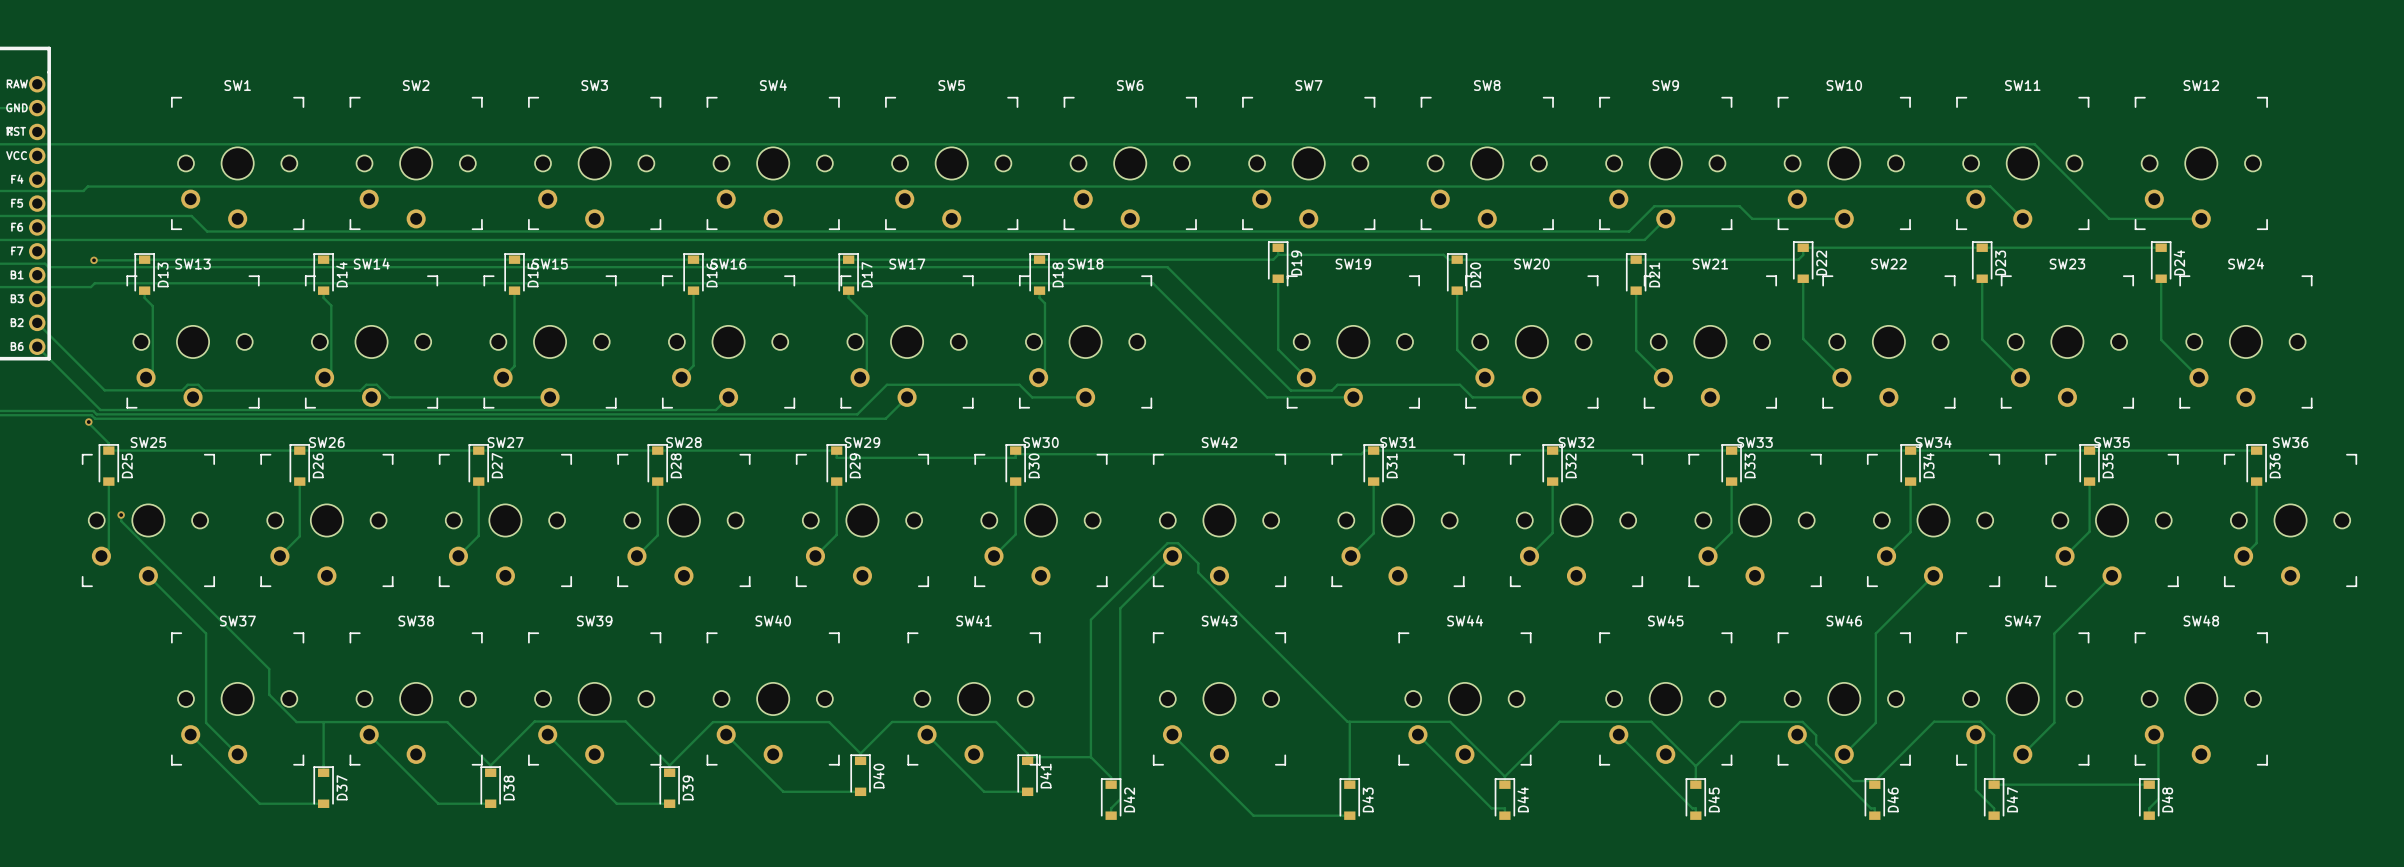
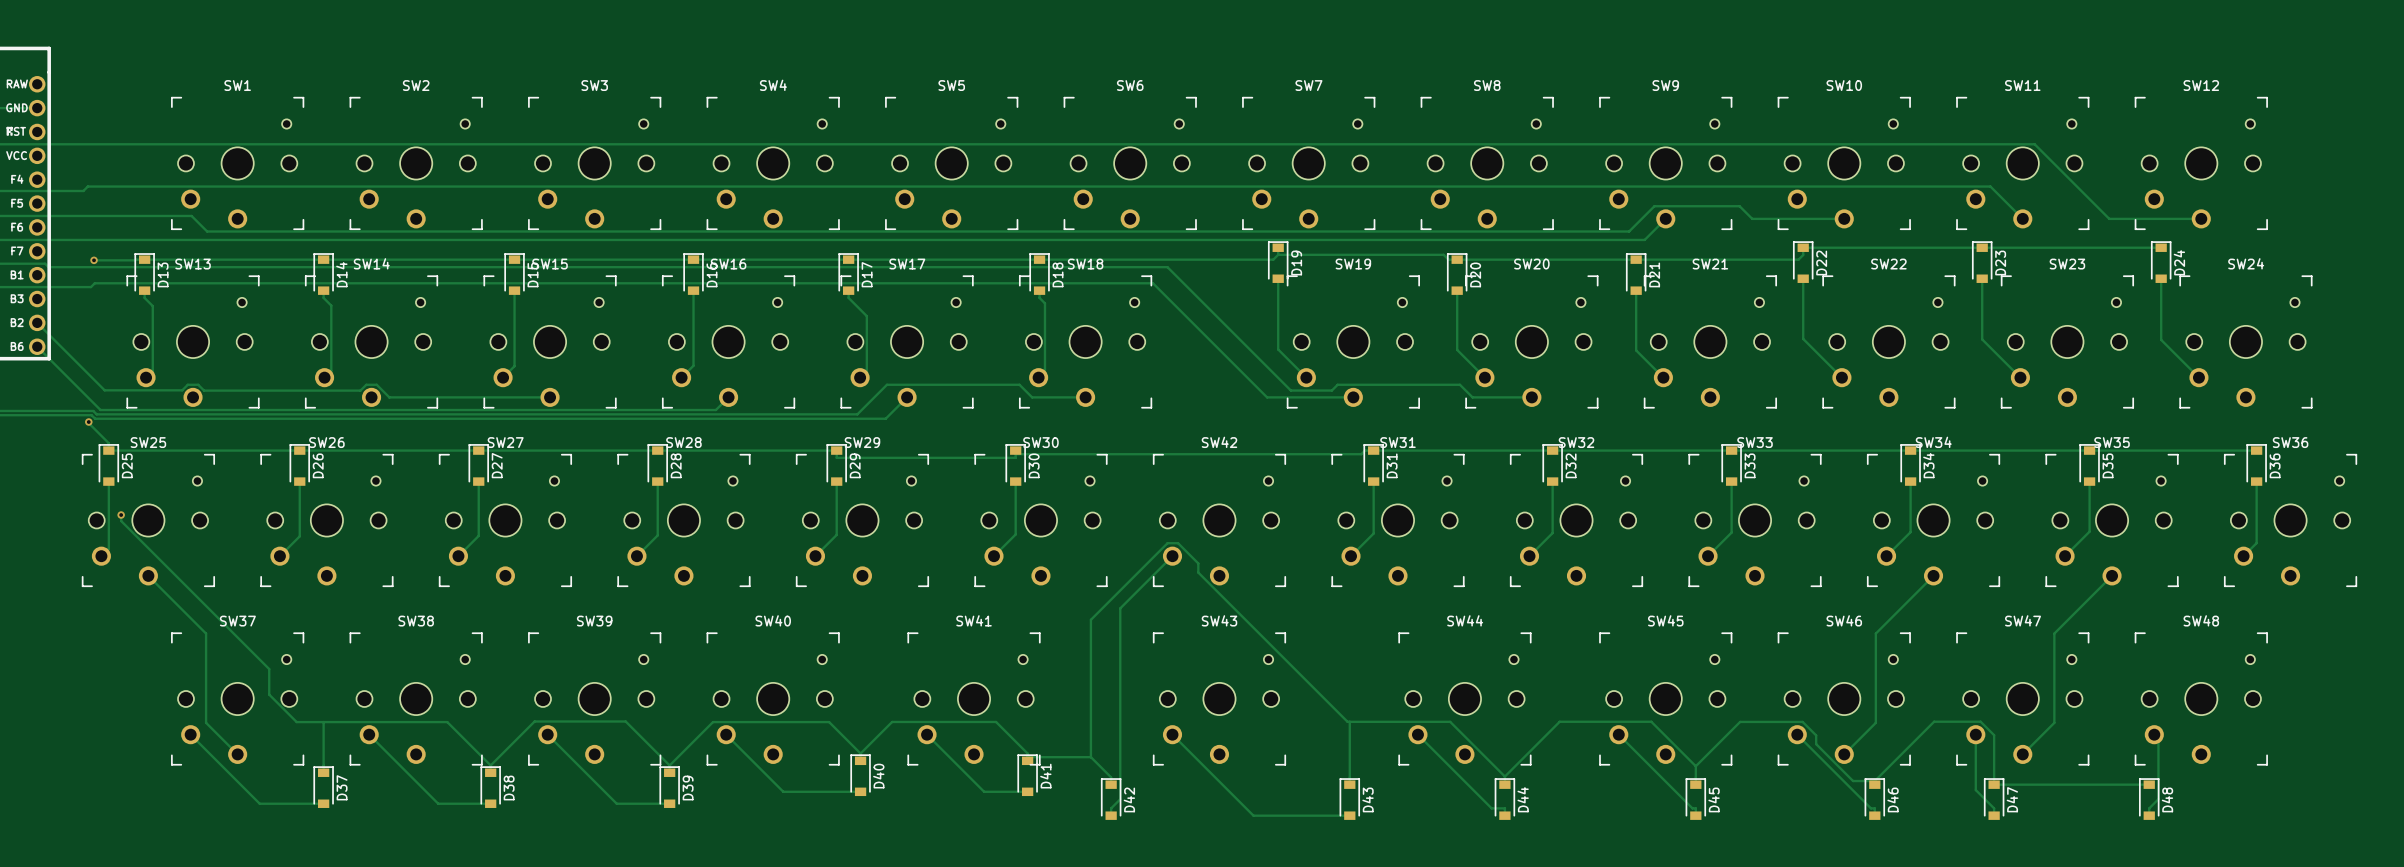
SW1 footprint: [171, 96, 305, 230] -> [171, 96, 305, 230]
SW2 footprint: [349, 96, 483, 230] -> [349, 96, 483, 230]
SW3 footprint: [528, 96, 662, 230] -> [528, 96, 662, 230]
SW4 footprint: [706, 96, 840, 230] -> [706, 96, 840, 230]
SW5 footprint: [885, 96, 1019, 230] -> [885, 96, 1019, 230]
SW6 footprint: [1063, 96, 1197, 230] -> [1063, 96, 1197, 230]
SW7 footprint: [1242, 96, 1376, 230] -> [1242, 96, 1376, 230]
SW8 footprint: [1420, 96, 1554, 230] -> [1420, 96, 1554, 230]
SW9 footprint: [1599, 96, 1733, 230] -> [1599, 96, 1733, 230]
SW10 footprint: [1777, 96, 1911, 230] -> [1777, 96, 1911, 230]
SW11 footprint: [1956, 96, 2090, 230] -> [1956, 96, 2090, 230]
SW12 footprint: [2134, 96, 2268, 230] -> [2134, 96, 2268, 230]
SW13 footprint: [126, 275, 260, 409] -> [126, 275, 260, 409]
SW14 footprint: [305, 275, 439, 409] -> [305, 275, 439, 409]
SW15 footprint: [483, 275, 617, 409] -> [483, 275, 617, 409]
SW16 footprint: [662, 275, 796, 409] -> [662, 275, 796, 409]
SW17 footprint: [840, 275, 974, 409] -> [840, 275, 974, 409]
SW18 footprint: [1019, 275, 1153, 409] -> [1019, 275, 1153, 409]
SW19 footprint: [1286, 275, 1420, 409] -> [1286, 275, 1420, 409]
SW20 footprint: [1465, 275, 1599, 409] -> [1465, 275, 1599, 409]
SW21 footprint: [1643, 275, 1777, 409] -> [1643, 275, 1777, 409]
SW22 footprint: [1822, 275, 1956, 409] -> [1822, 275, 1956, 409]
SW23 footprint: [2000, 275, 2134, 409] -> [2000, 275, 2134, 409]
SW24 footprint: [2179, 275, 2313, 409] -> [2179, 275, 2313, 409]
SW25 footprint: [81, 454, 215, 587] -> [81, 454, 215, 587]
SW26 footprint: [260, 454, 394, 587] -> [260, 454, 394, 587]
SW27 footprint: [438, 454, 572, 587] -> [438, 454, 572, 587]
SW28 footprint: [617, 454, 751, 587] -> [617, 454, 751, 587]
SW29 footprint: [795, 454, 929, 587] -> [795, 454, 929, 587]
SW30 footprint: [974, 454, 1108, 587] -> [974, 454, 1108, 587]
SW42 footprint: [1153, 454, 1286, 587] -> [1153, 454, 1286, 587]
SW31 footprint: [1331, 454, 1465, 587] -> [1331, 454, 1465, 587]
SW32 footprint: [1510, 454, 1643, 587] -> [1510, 454, 1643, 587]
SW33 footprint: [1688, 454, 1822, 587] -> [1688, 454, 1822, 587]
SW34 footprint: [1867, 454, 2001, 587] -> [1867, 454, 2001, 587]
SW35 footprint: [2045, 454, 2179, 587] -> [2045, 454, 2179, 587]
SW36 footprint: [2224, 454, 2358, 587] -> [2224, 454, 2358, 587]
SW37 footprint: [171, 632, 305, 766] -> [171, 632, 305, 766]
SW38 footprint: [349, 632, 483, 766] -> [349, 632, 483, 766]
SW39 footprint: [528, 632, 662, 766] -> [528, 632, 662, 766]
SW40 footprint: [706, 632, 840, 766] -> [706, 632, 840, 766]
SW41 footprint: [907, 632, 1041, 766] -> [907, 632, 1041, 766]
SW43 footprint: [1153, 632, 1286, 766] -> [1153, 632, 1286, 766]
SW44 footprint: [1398, 632, 1532, 766] -> [1398, 632, 1532, 766]
SW45 footprint: [1599, 632, 1733, 766] -> [1599, 632, 1733, 766]
SW46 footprint: [1777, 632, 1911, 766] -> [1777, 632, 1911, 766]
SW47 footprint: [1956, 632, 2090, 766] -> [1956, 632, 2090, 766]
SW48 footprint: [2134, 632, 2268, 766] -> [2134, 632, 2268, 766]

